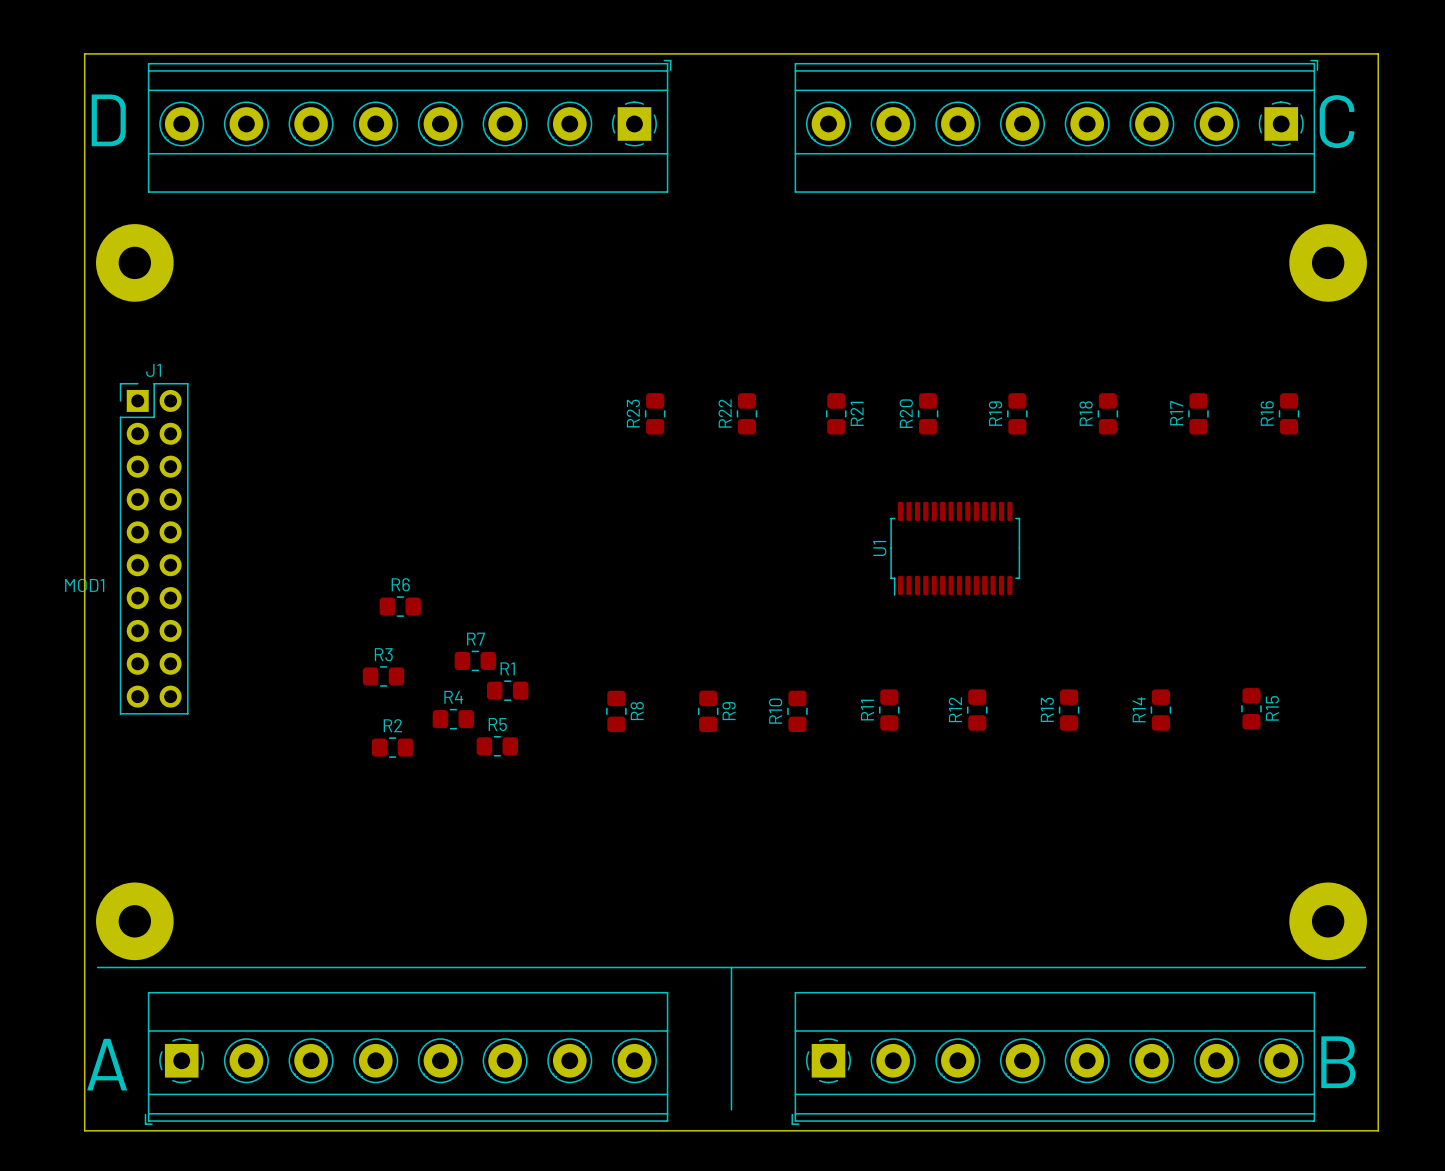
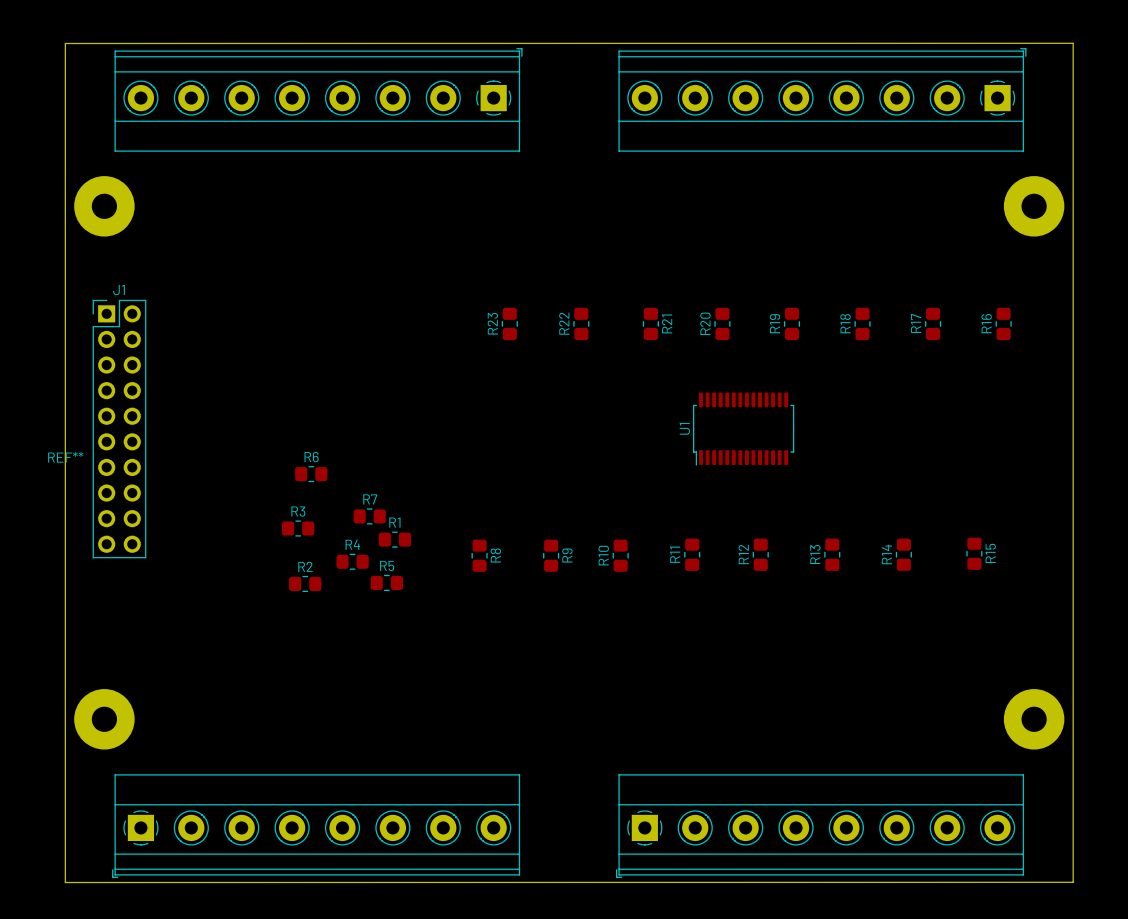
MOD1: (731, 592) -> none
REF**: none -> (569, 462)

